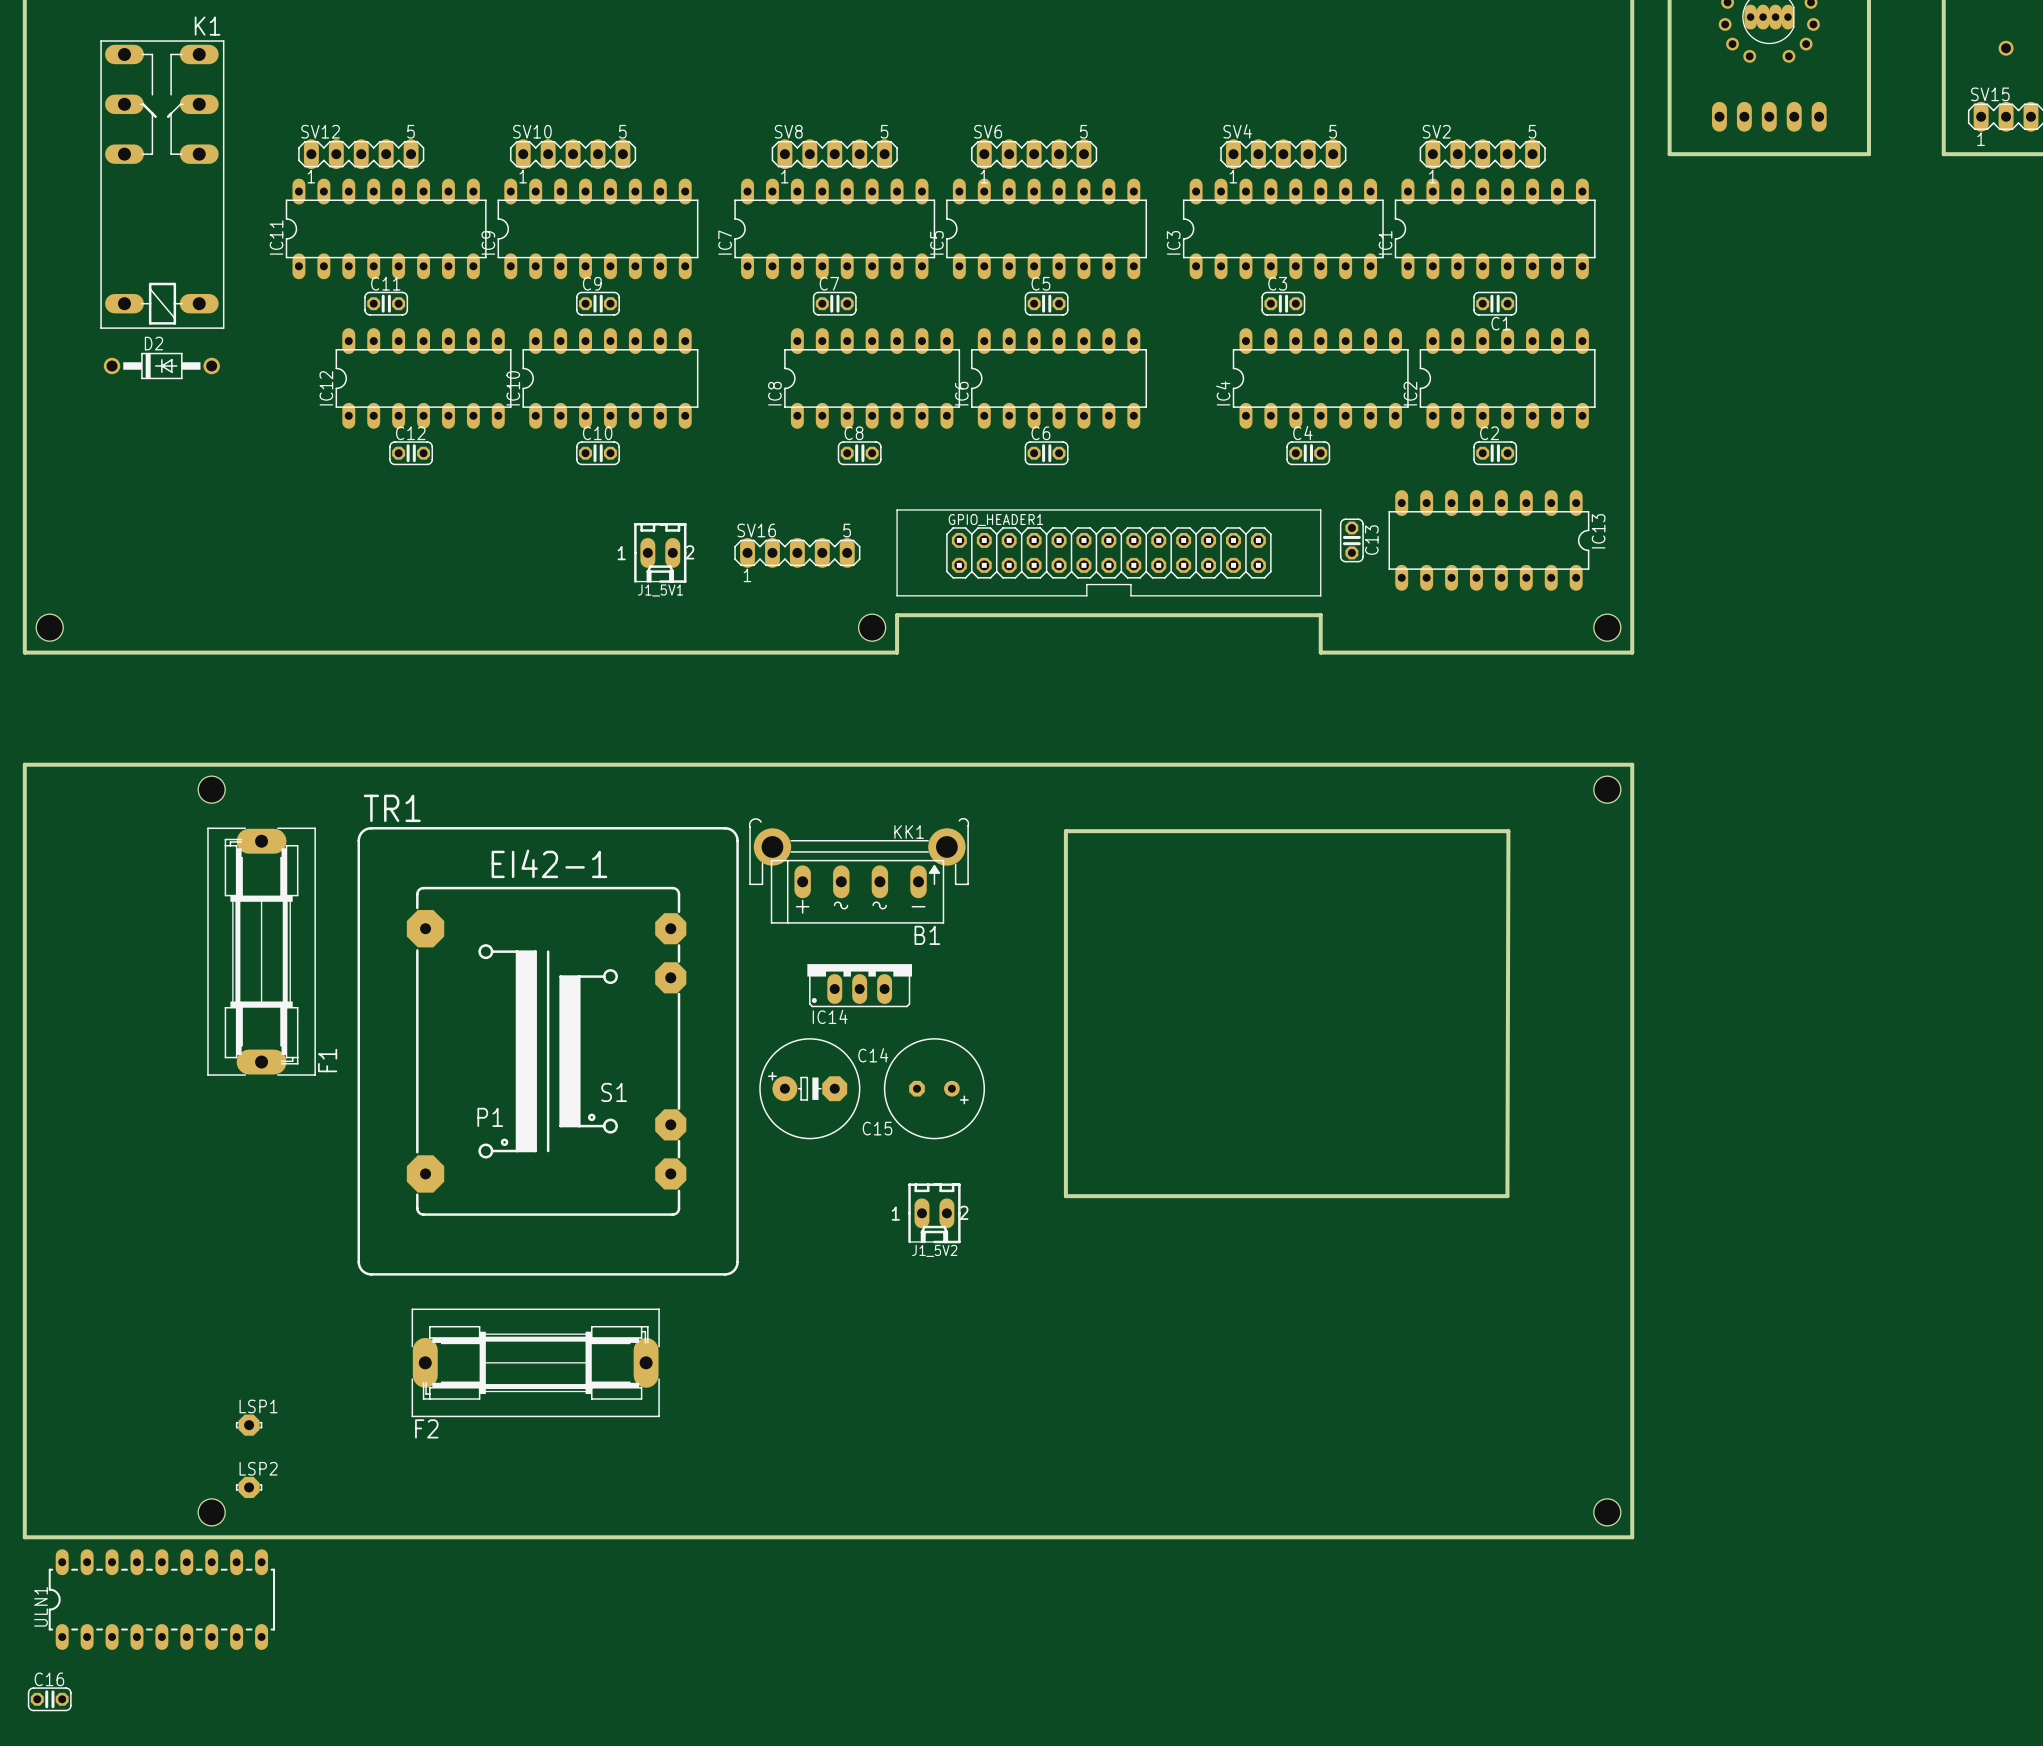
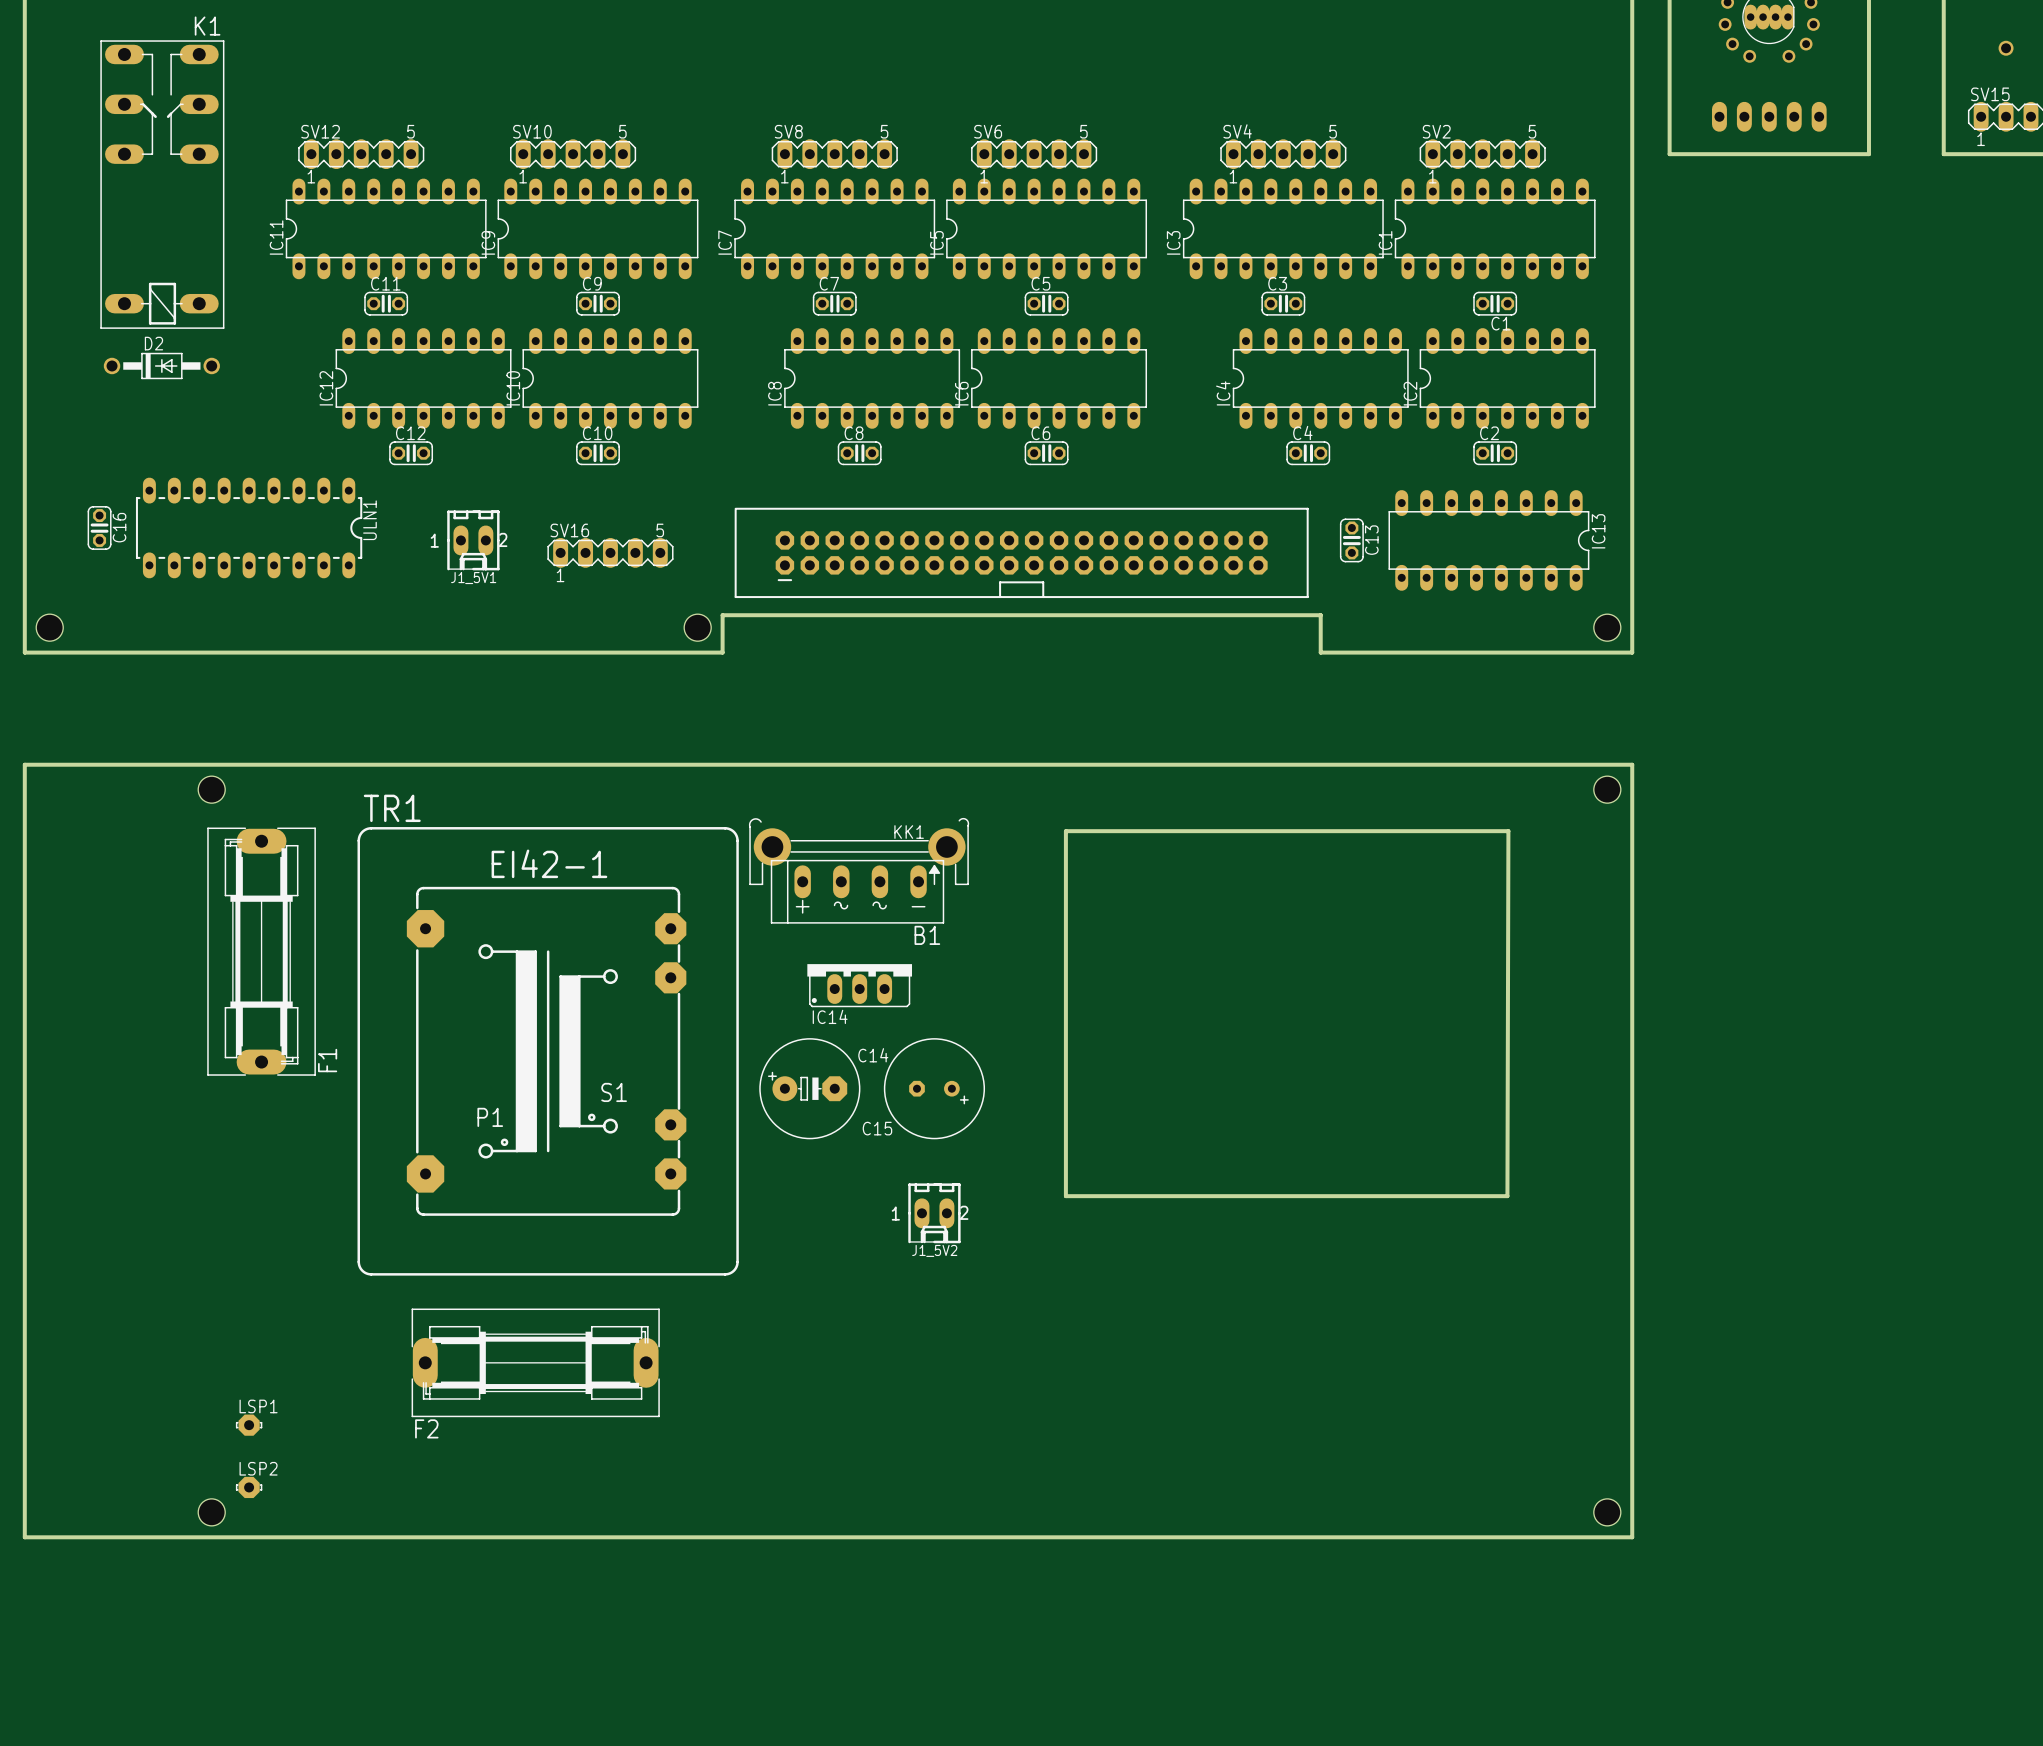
J1_5V1 position: (660, 552) -> (473, 540)
SV16 position: (797, 552) -> (610, 552)
part: none -> (1021, 552)
GPIO_HEADER1: (1108, 552) -> none
board edge: (897, 615) (897, 652) (722, 652) -> (897, 615) (722, 615) (722, 652)
hole position: (872, 627) -> (697, 627)
ULN1 rotation: 0° (161, 1599) -> 180° (249, 527)
ULN1 position: (161, 1599) -> (249, 527)
C16 rotation: 0° (49, 1699) -> 90° clockwise (99, 527)
C16 position: (49, 1699) -> (99, 527)

